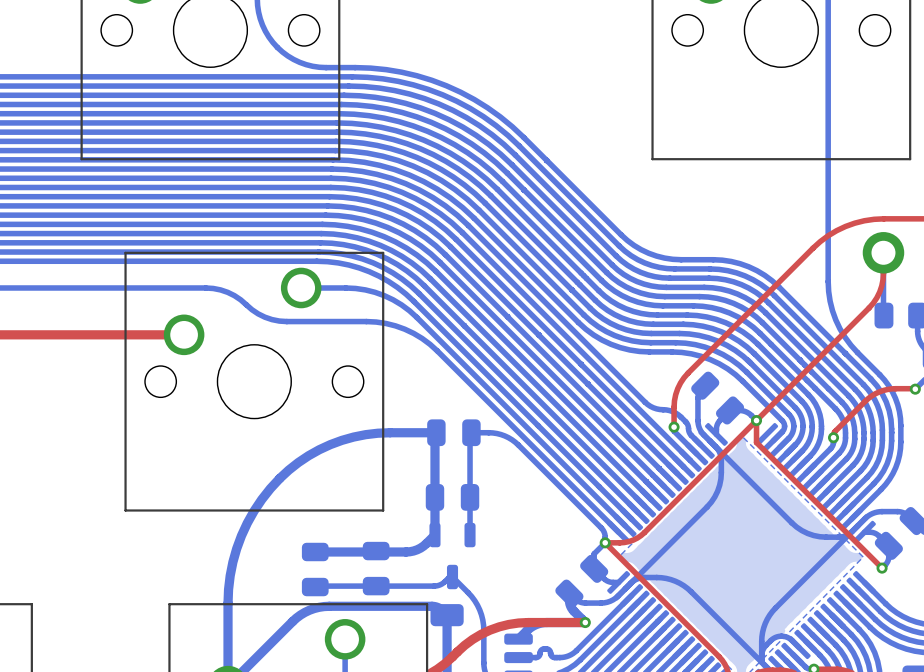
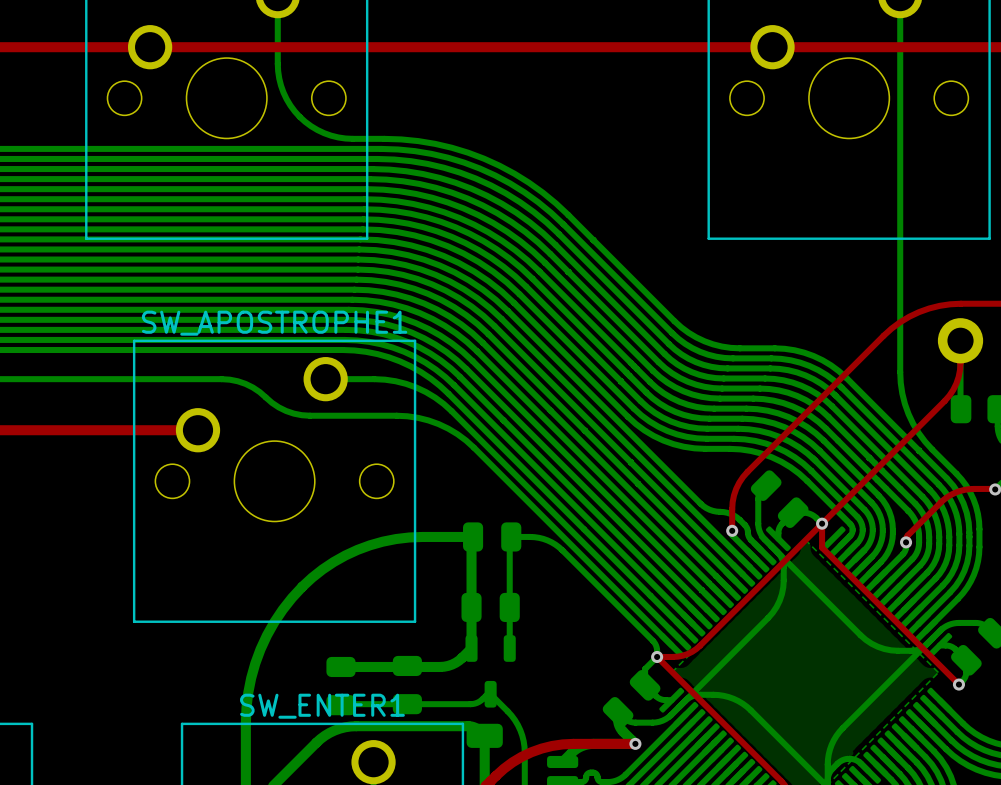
SW_APOSTROPHE1 name: none -> SW_APOSTROPHE1 (274, 323)
SW_ENTER1 name: none -> SW_ENTER1 (322, 706)

